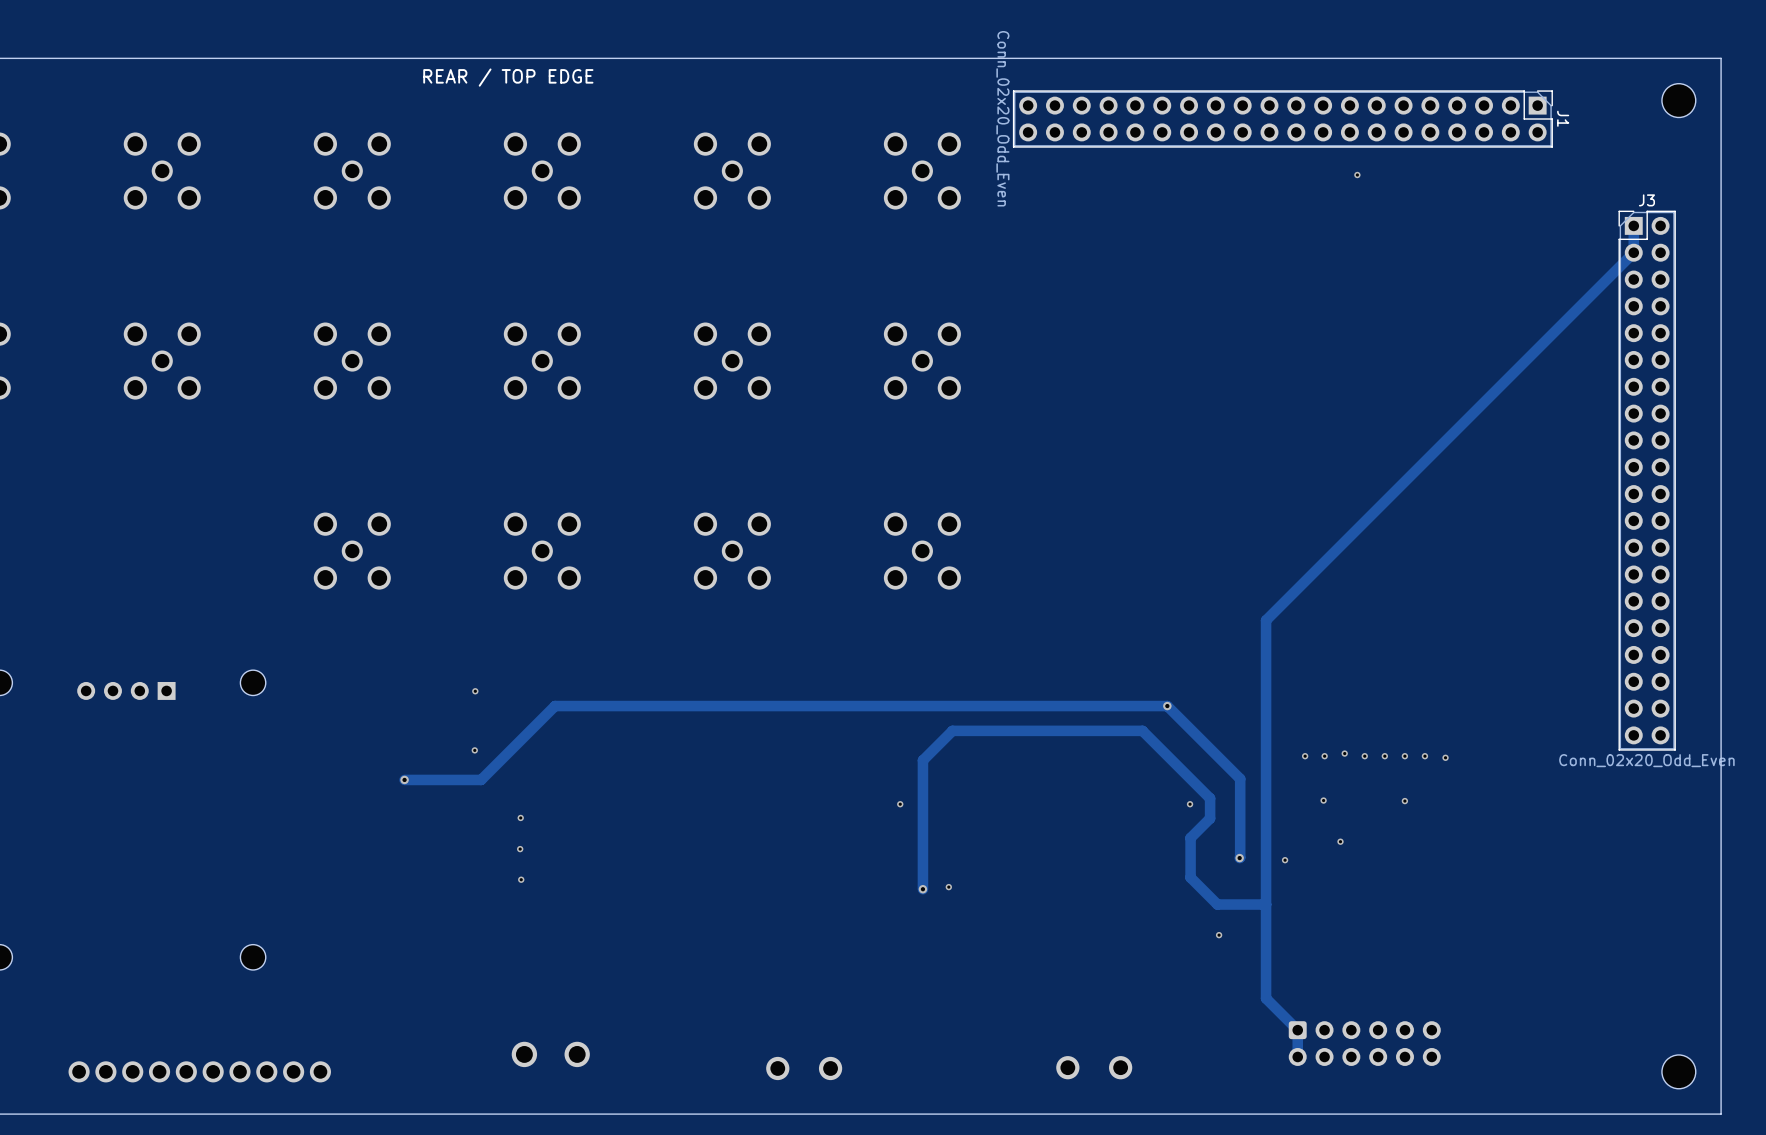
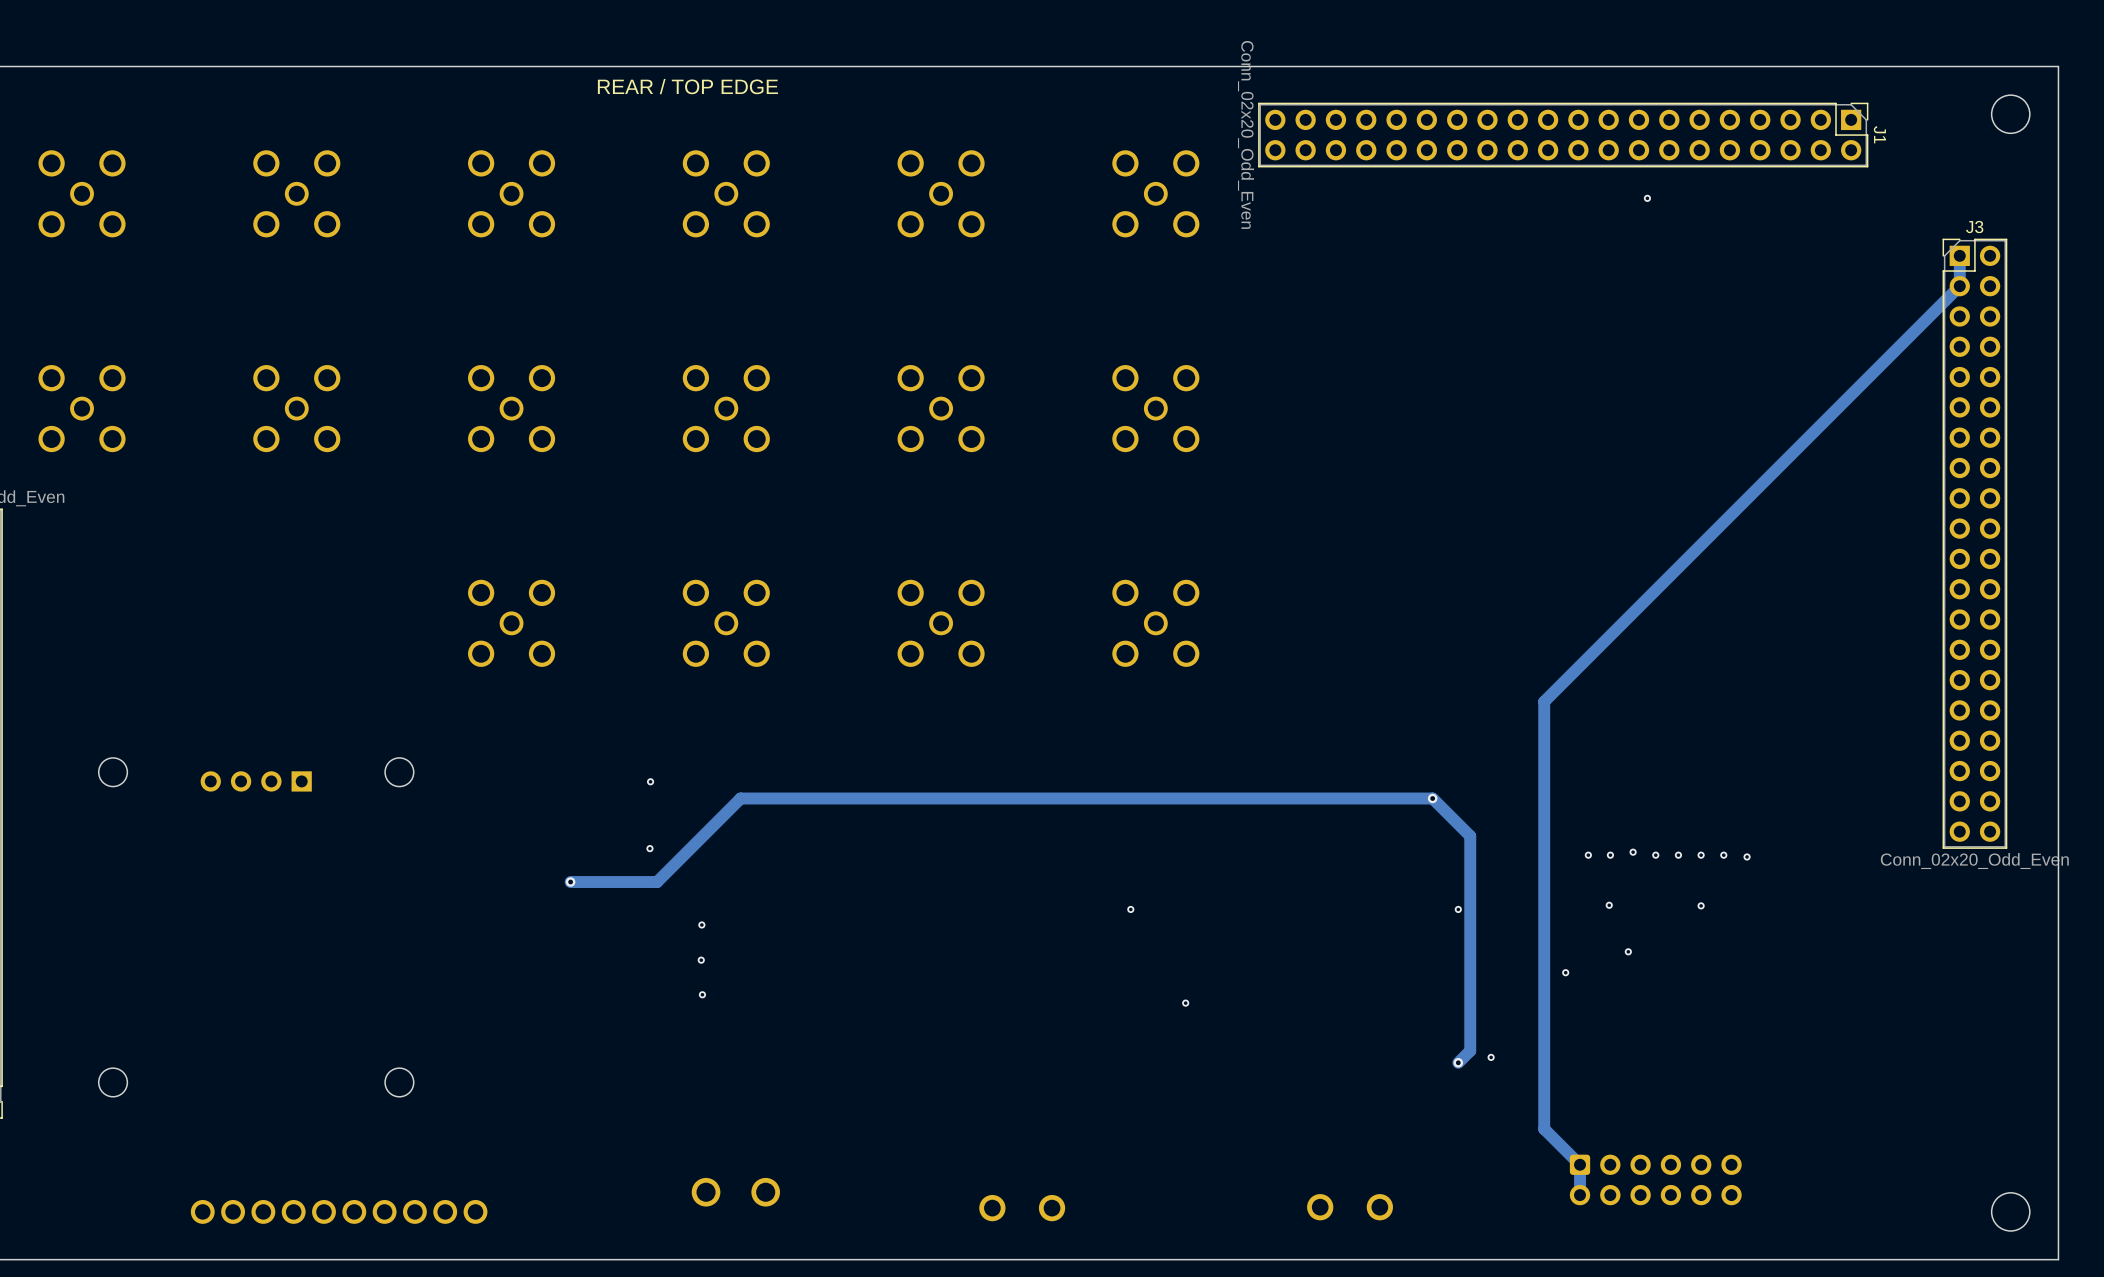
track: (1200, 739) (1240, 778) (1239, 858) -> (1470, 836) (1470, 1050) (1458, 1062)
via: (1239, 858) -> none
track: (922, 889) (922, 760) (952, 730) (1142, 730) (1210, 798) (1210, 818) (1190, 838) (1190, 877) (1217, 904) (1266, 904) -> none
via: (922, 889) -> none
via: none -> (1458, 1062)

